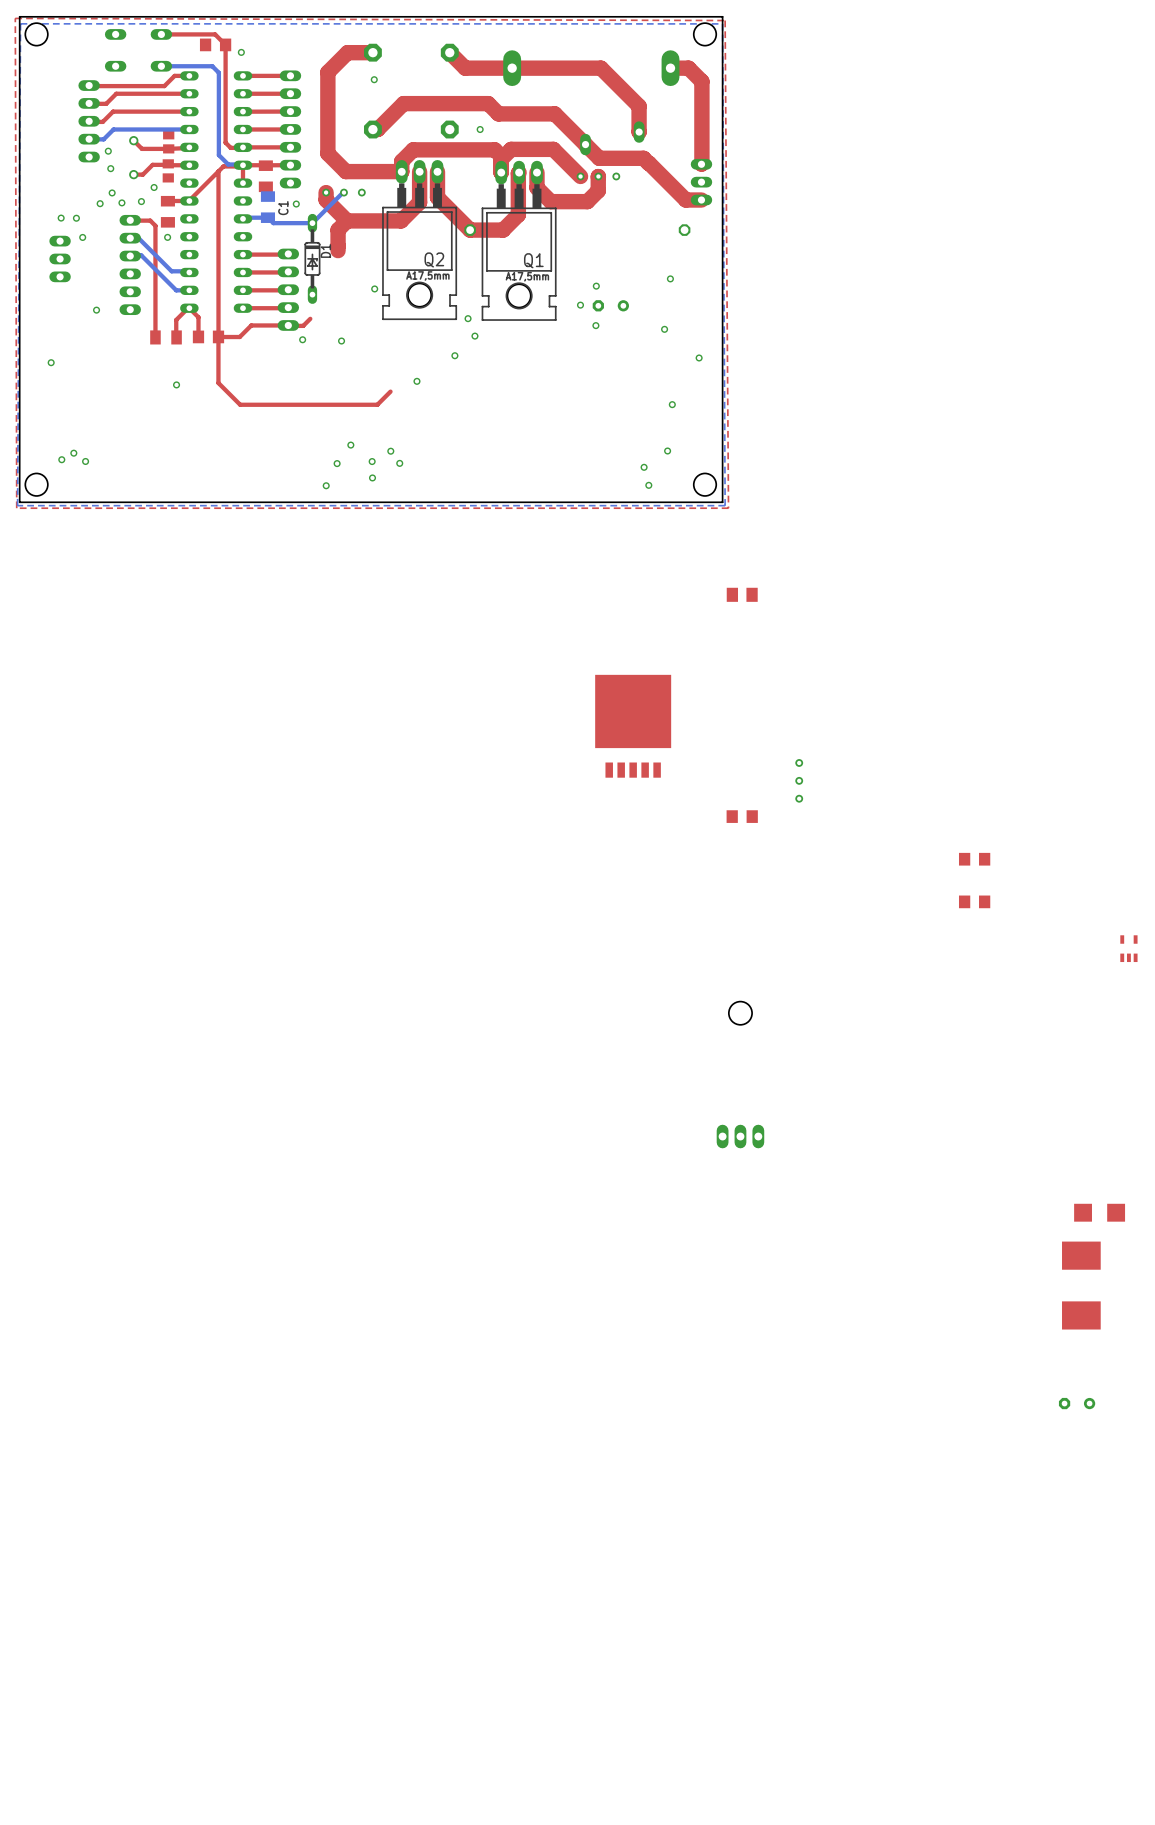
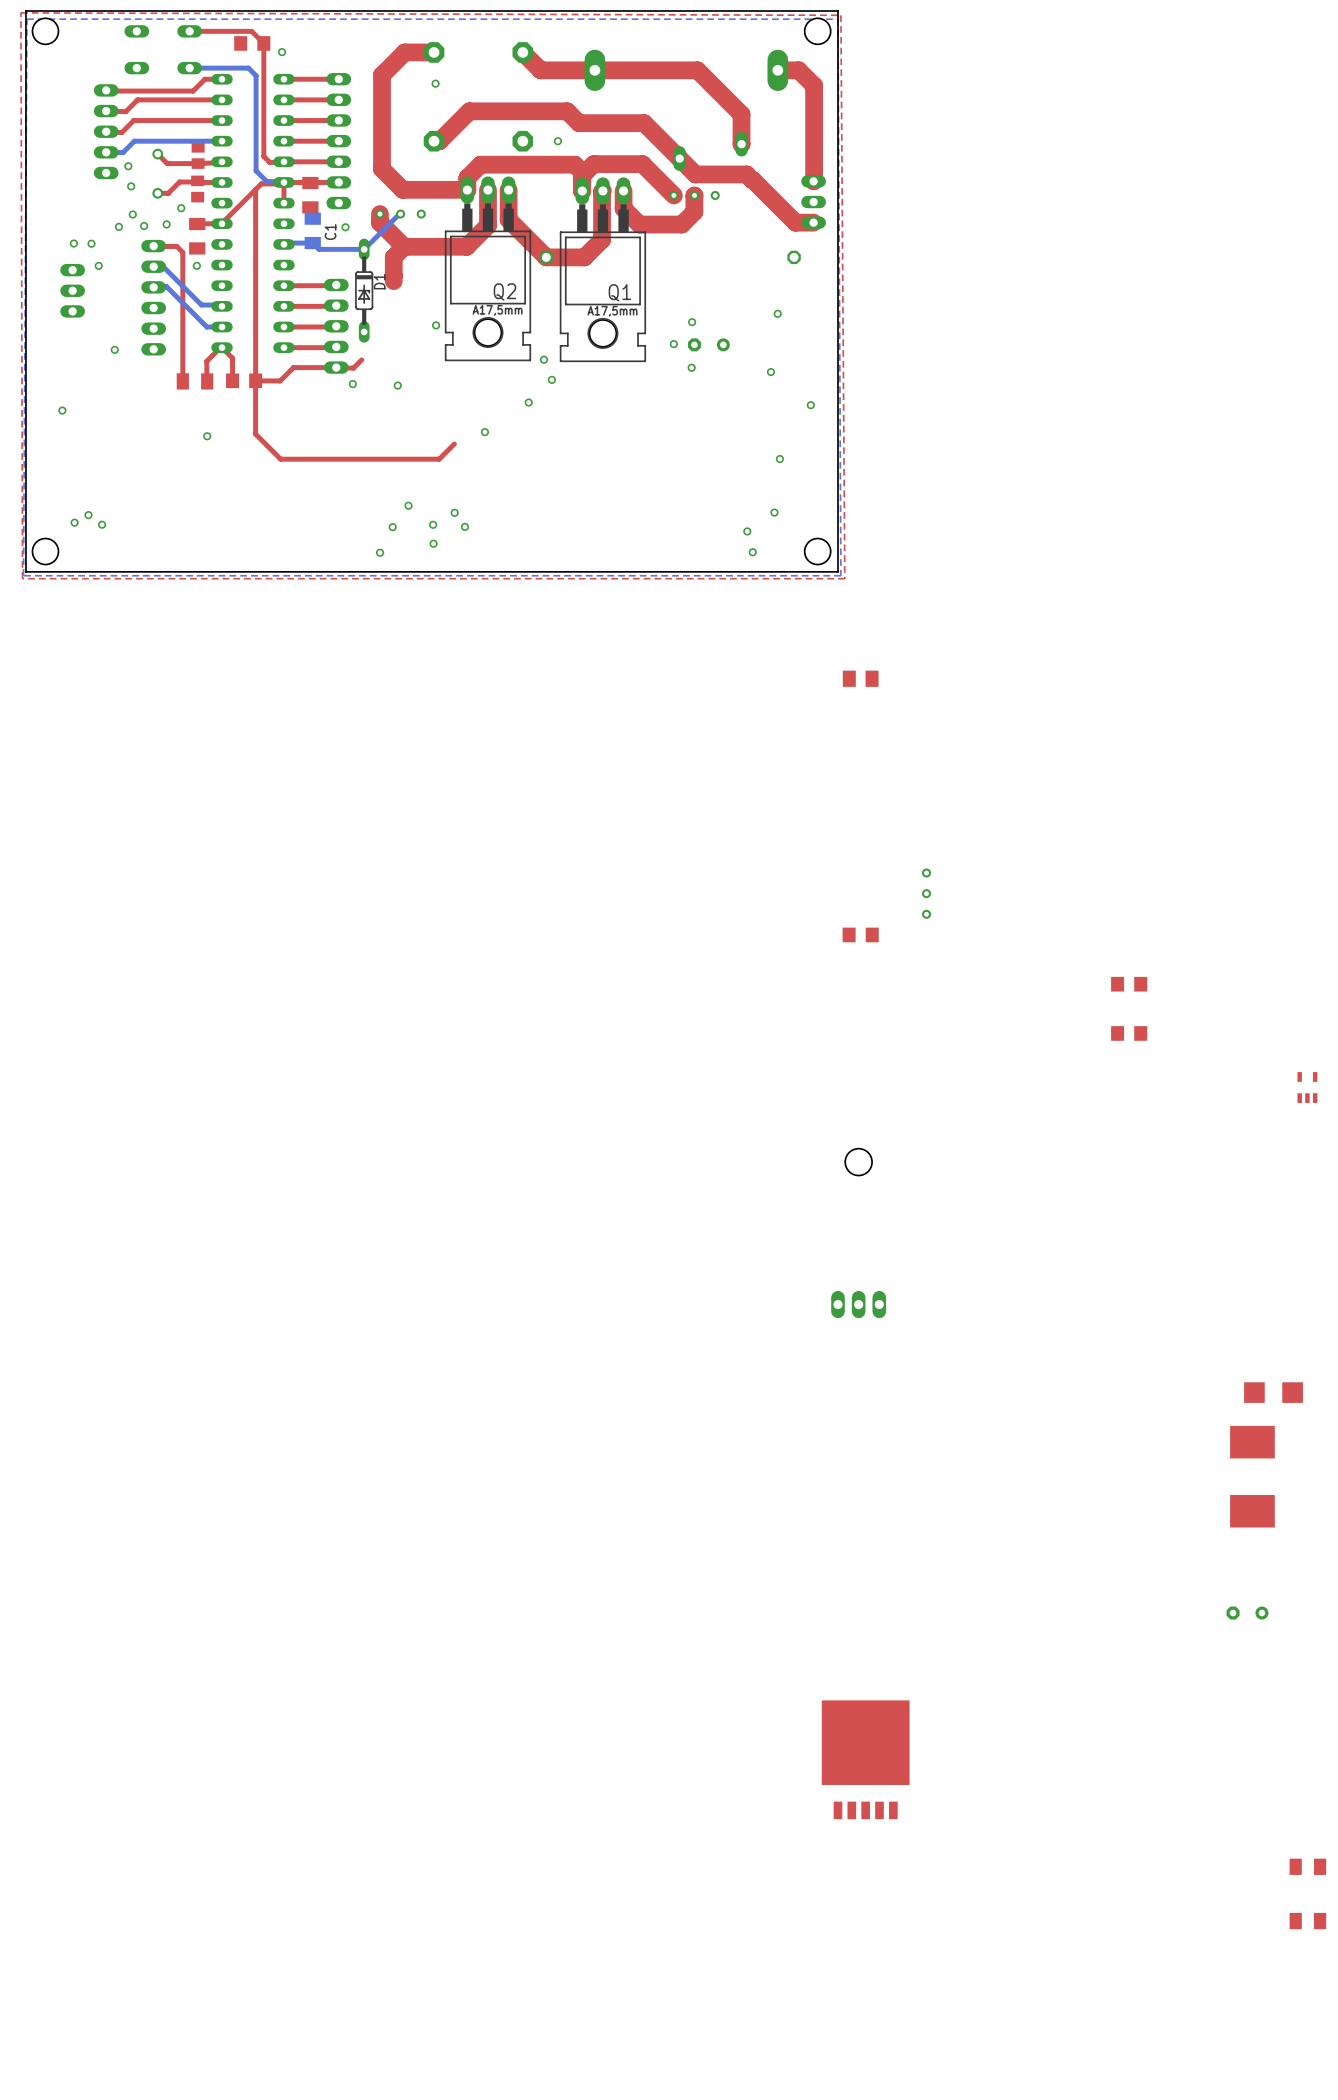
part: (633, 726) -> none
part: none -> (865, 1759)
part: none -> (1307, 1866)
part: none -> (1307, 1921)

